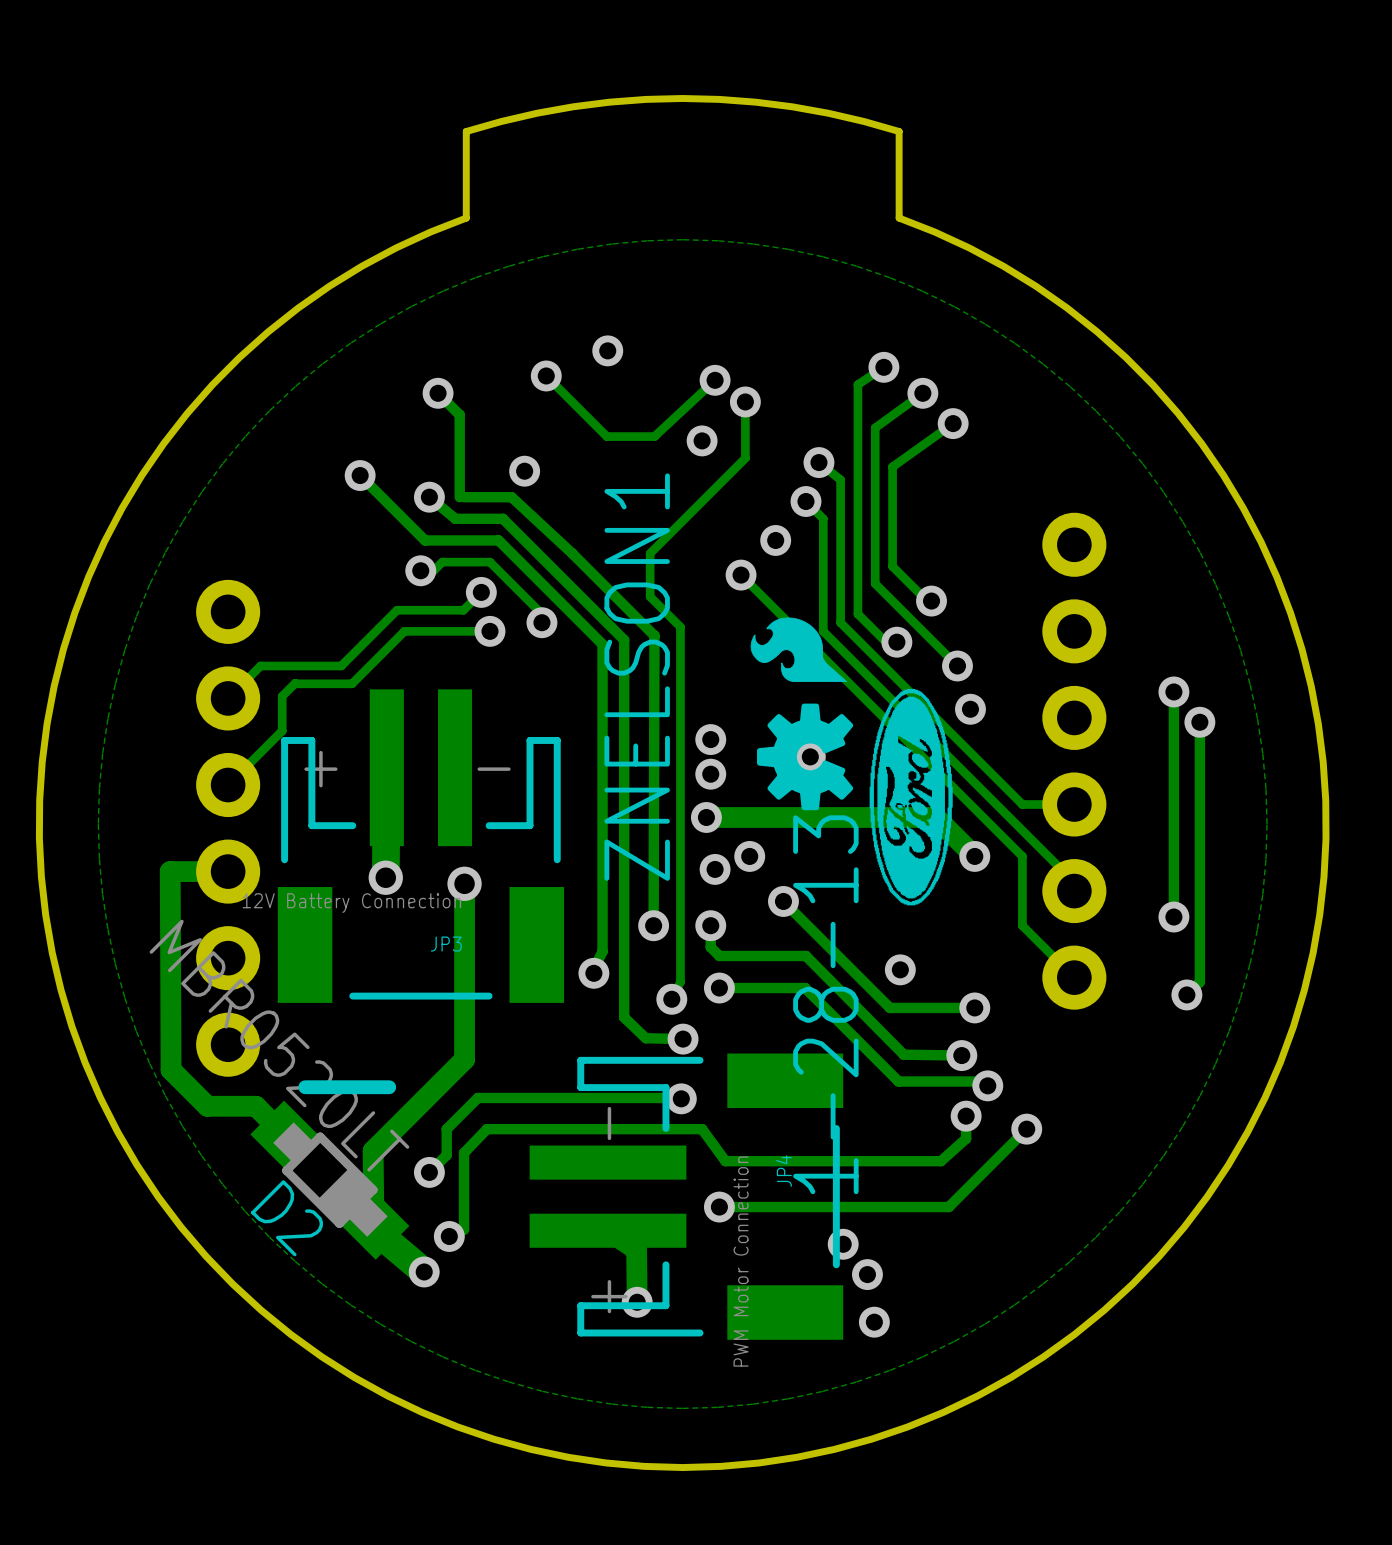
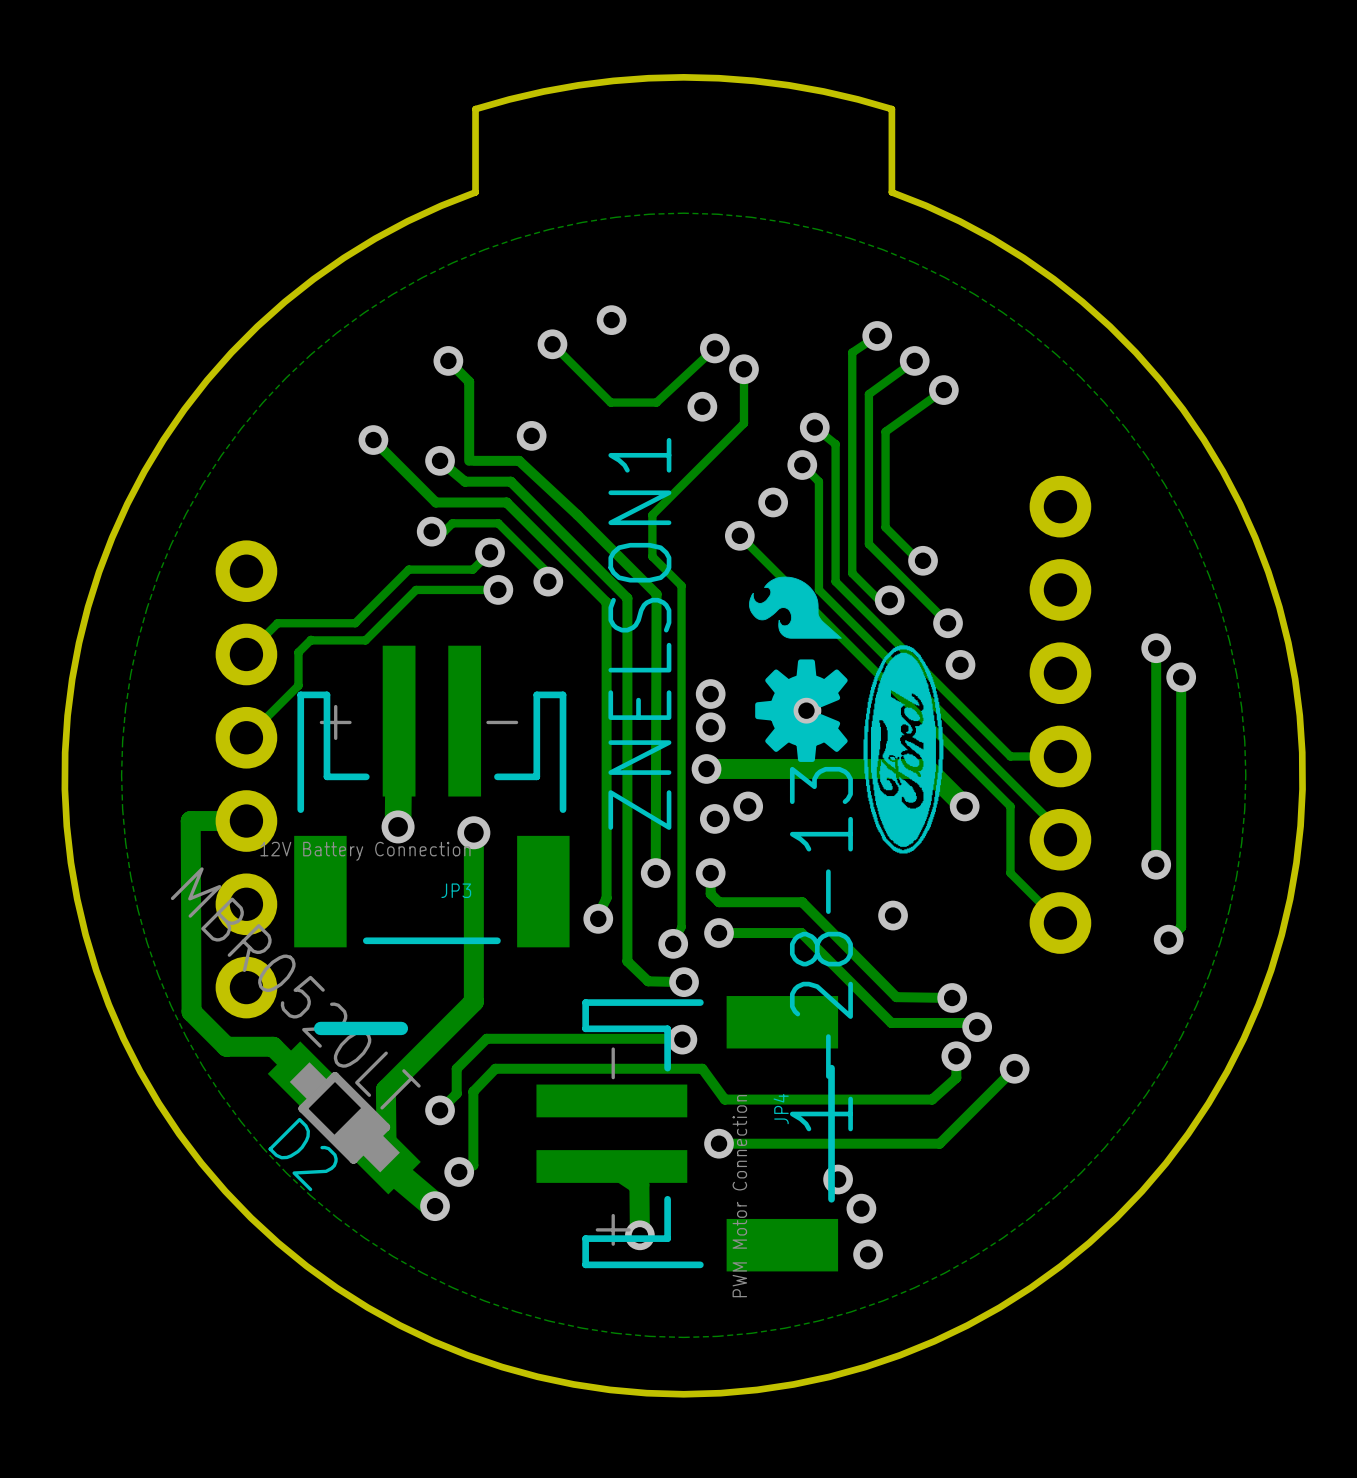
track: (783, 901) (889, 1007) (974, 1007) -> none
via: (783, 901) -> none
via: (974, 1007) -> none

